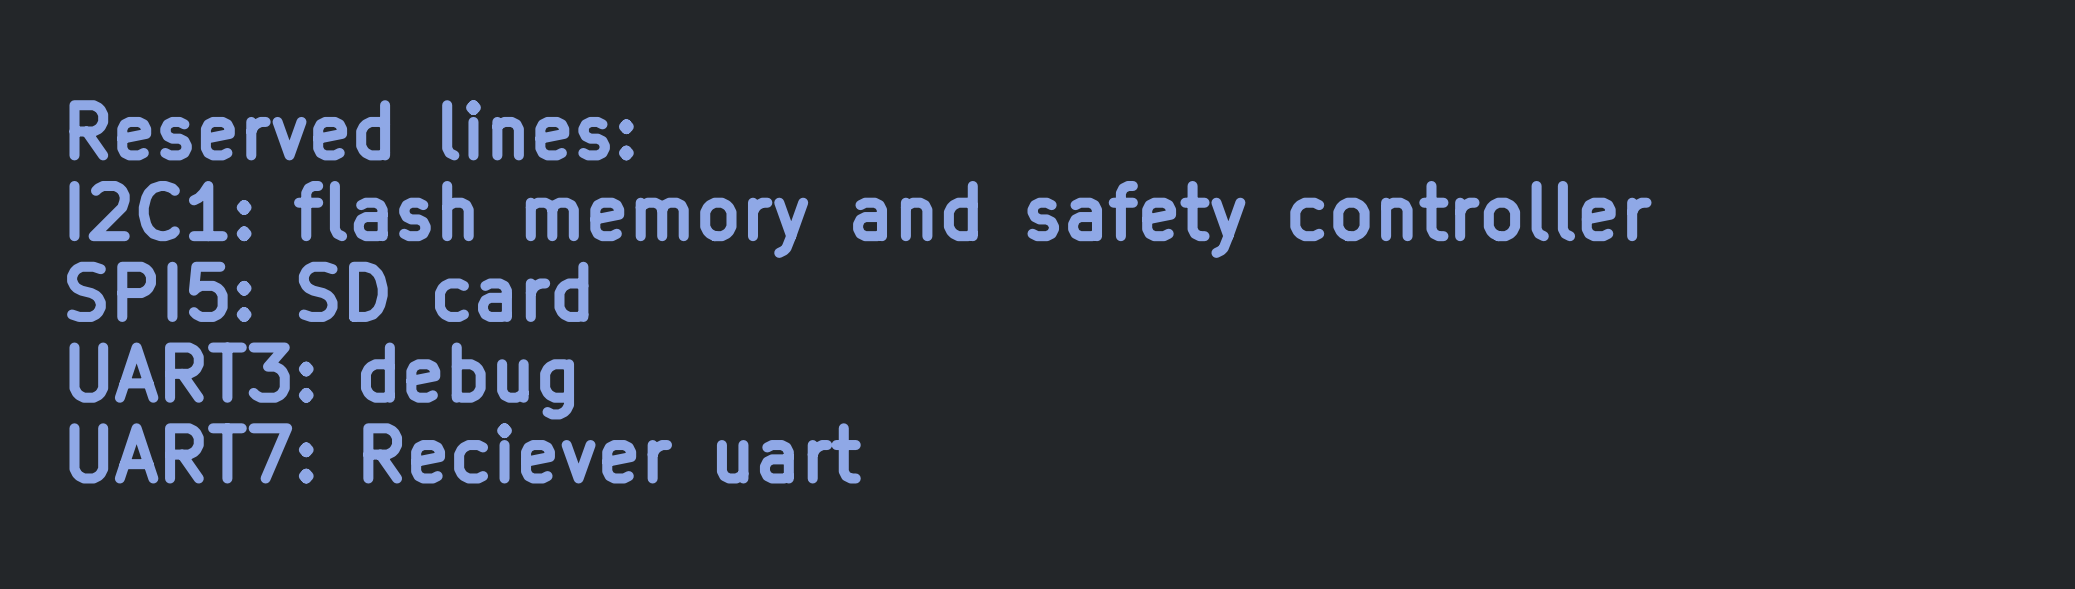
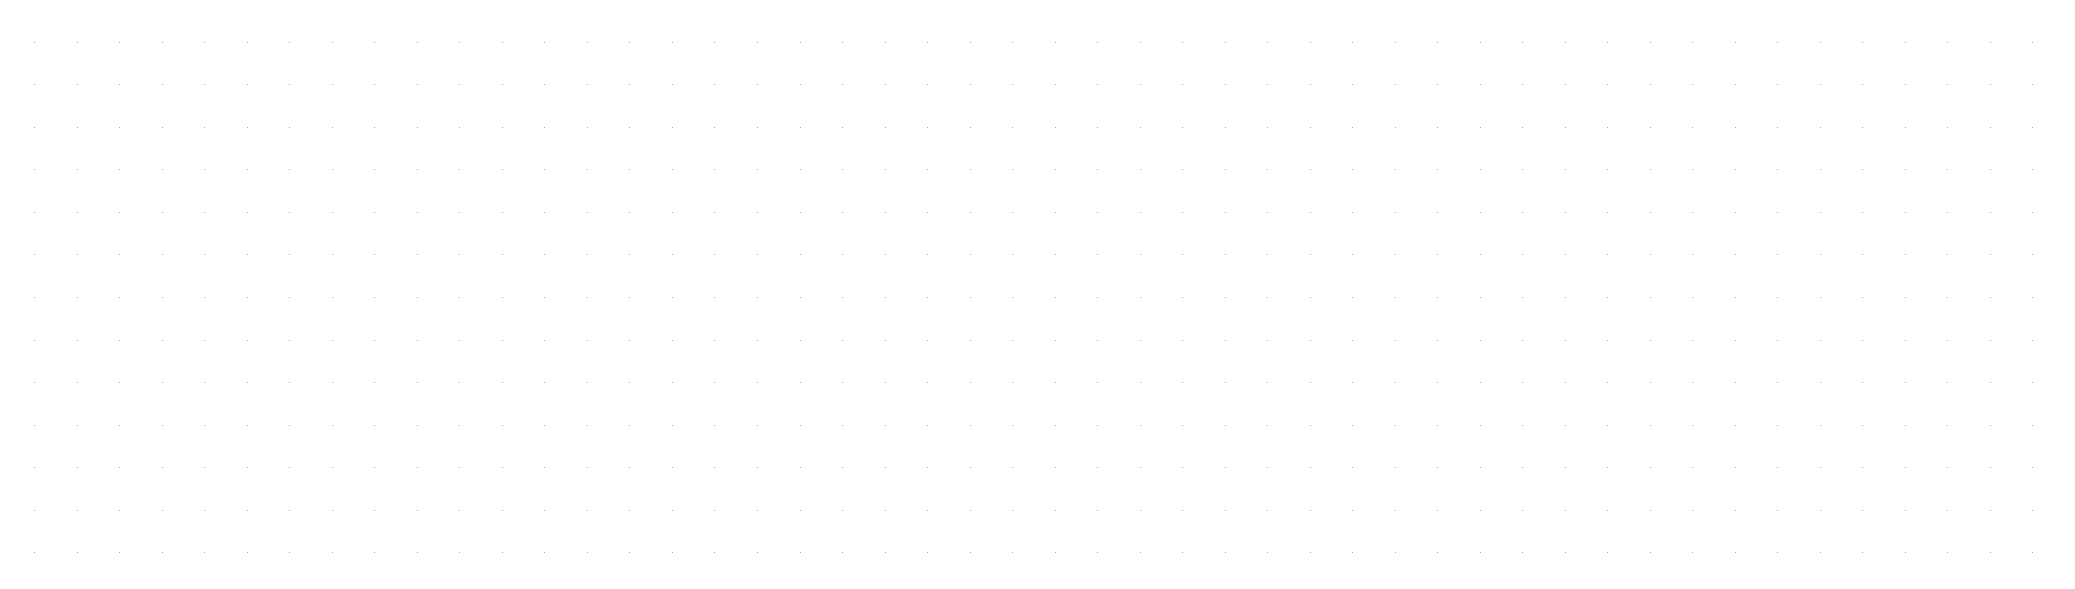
text: Reserved lines: (351, 130) -> none
text: I2C1: flash memory and safety controller (860, 219) -> none
text: SPI5: SD card (327, 291) -> none
text: UART3: debug (321, 380) -> none
text: UART7: Reciever uart (465, 453) -> none

